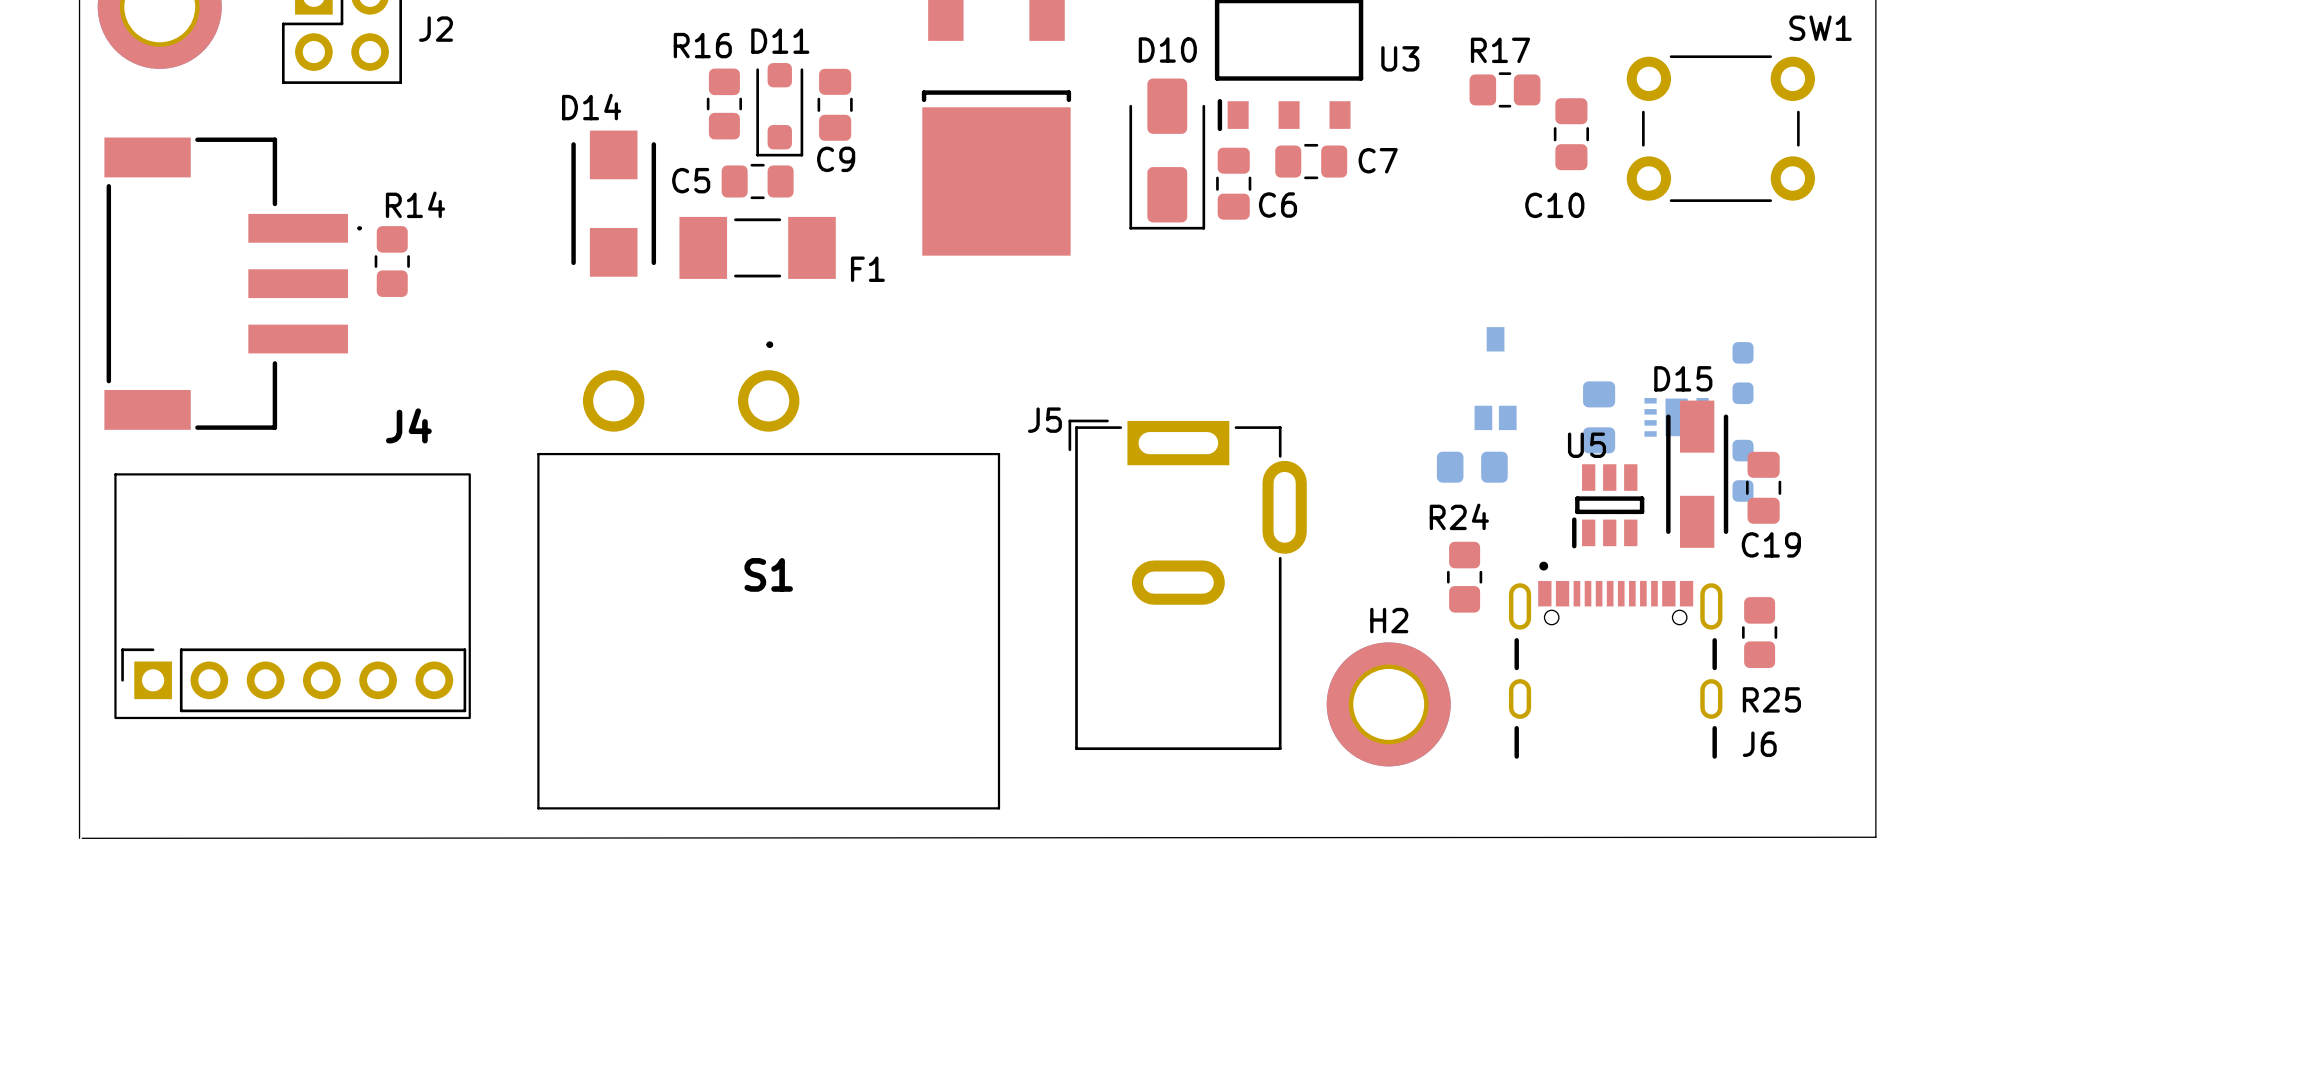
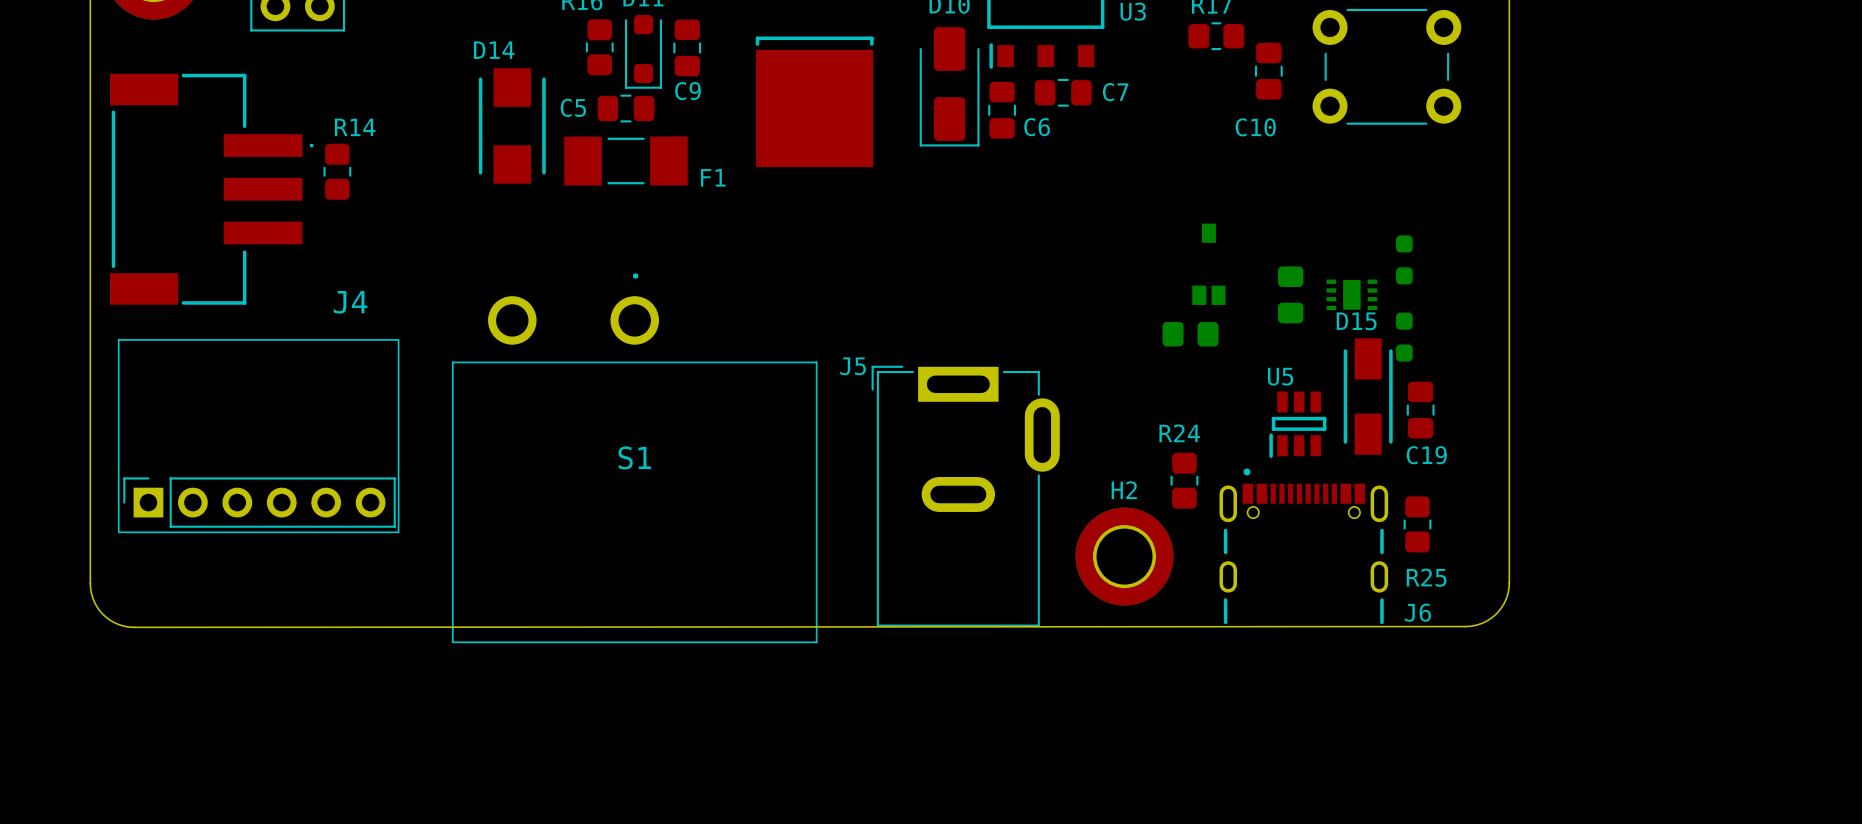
D15 position: (1697, 474) -> (1368, 396)
C19 position: (1763, 487) -> (1420, 410)
U5 position: (1608, 506) -> (1297, 424)
S1 position: (768, 575) -> (634, 458)
R24 position: (1464, 577) -> (1184, 480)
J5 position: (1187, 584) -> (965, 496)
R25 position: (1759, 632) -> (1417, 524)
J6 position: (1615, 660) -> (1303, 546)
H2 position: (1388, 704) -> (1124, 556)
board edge: (1875, 781) (1875, 837) (82, 838) -> (1509, 582) (1506, 599) (1496, 613) (1482, 623) (1465, 626) (134, 627) (115, 623) (103, 614) (94, 602) (90, 583)
board edge: (79, 782) (79, 838) -> none

